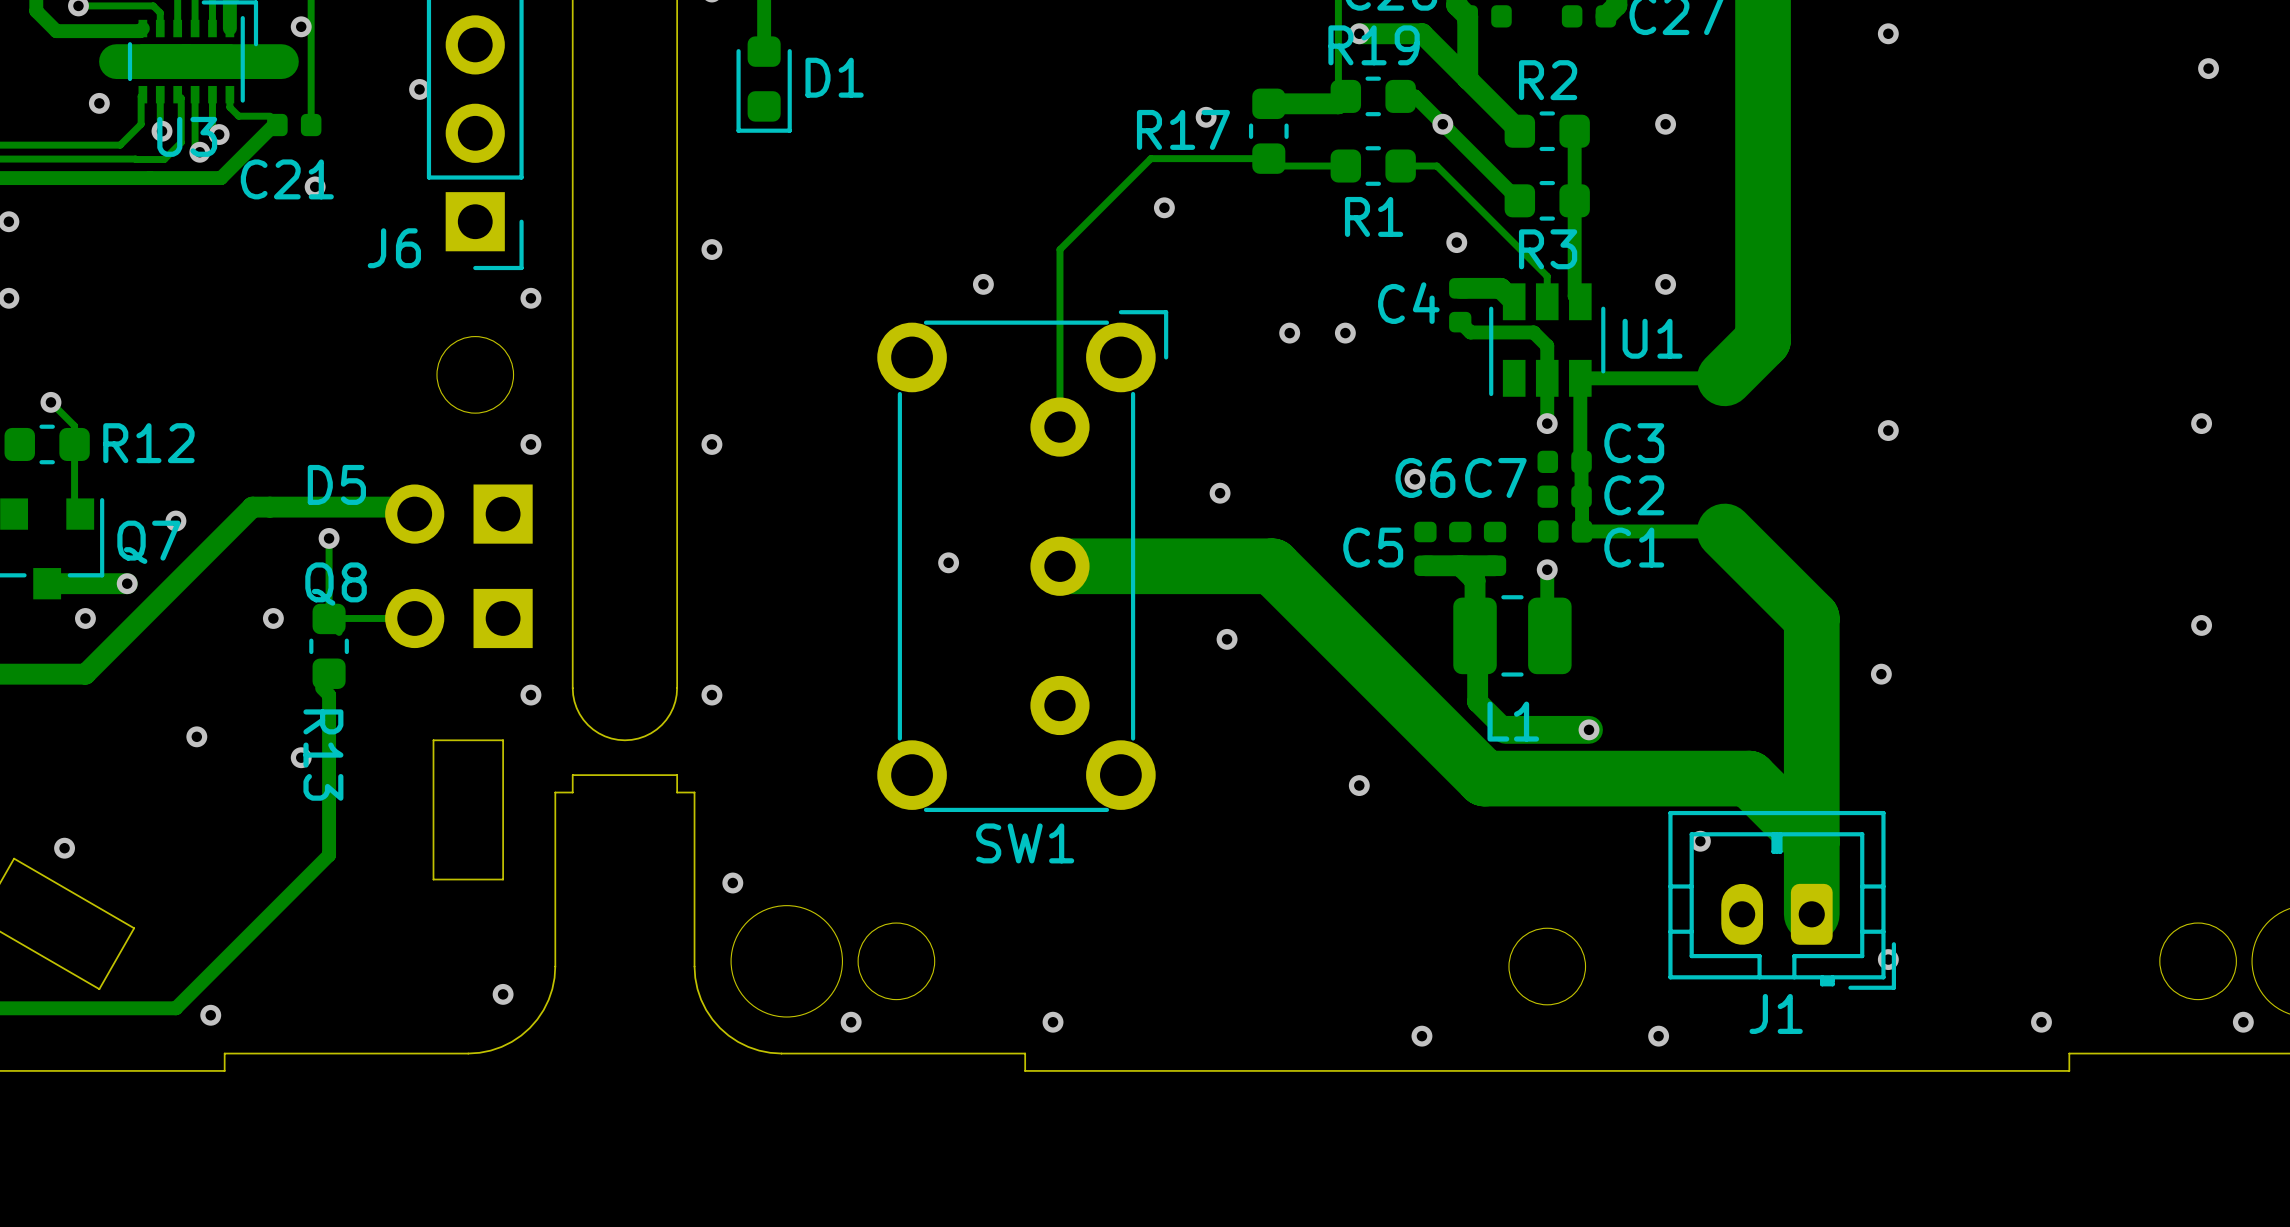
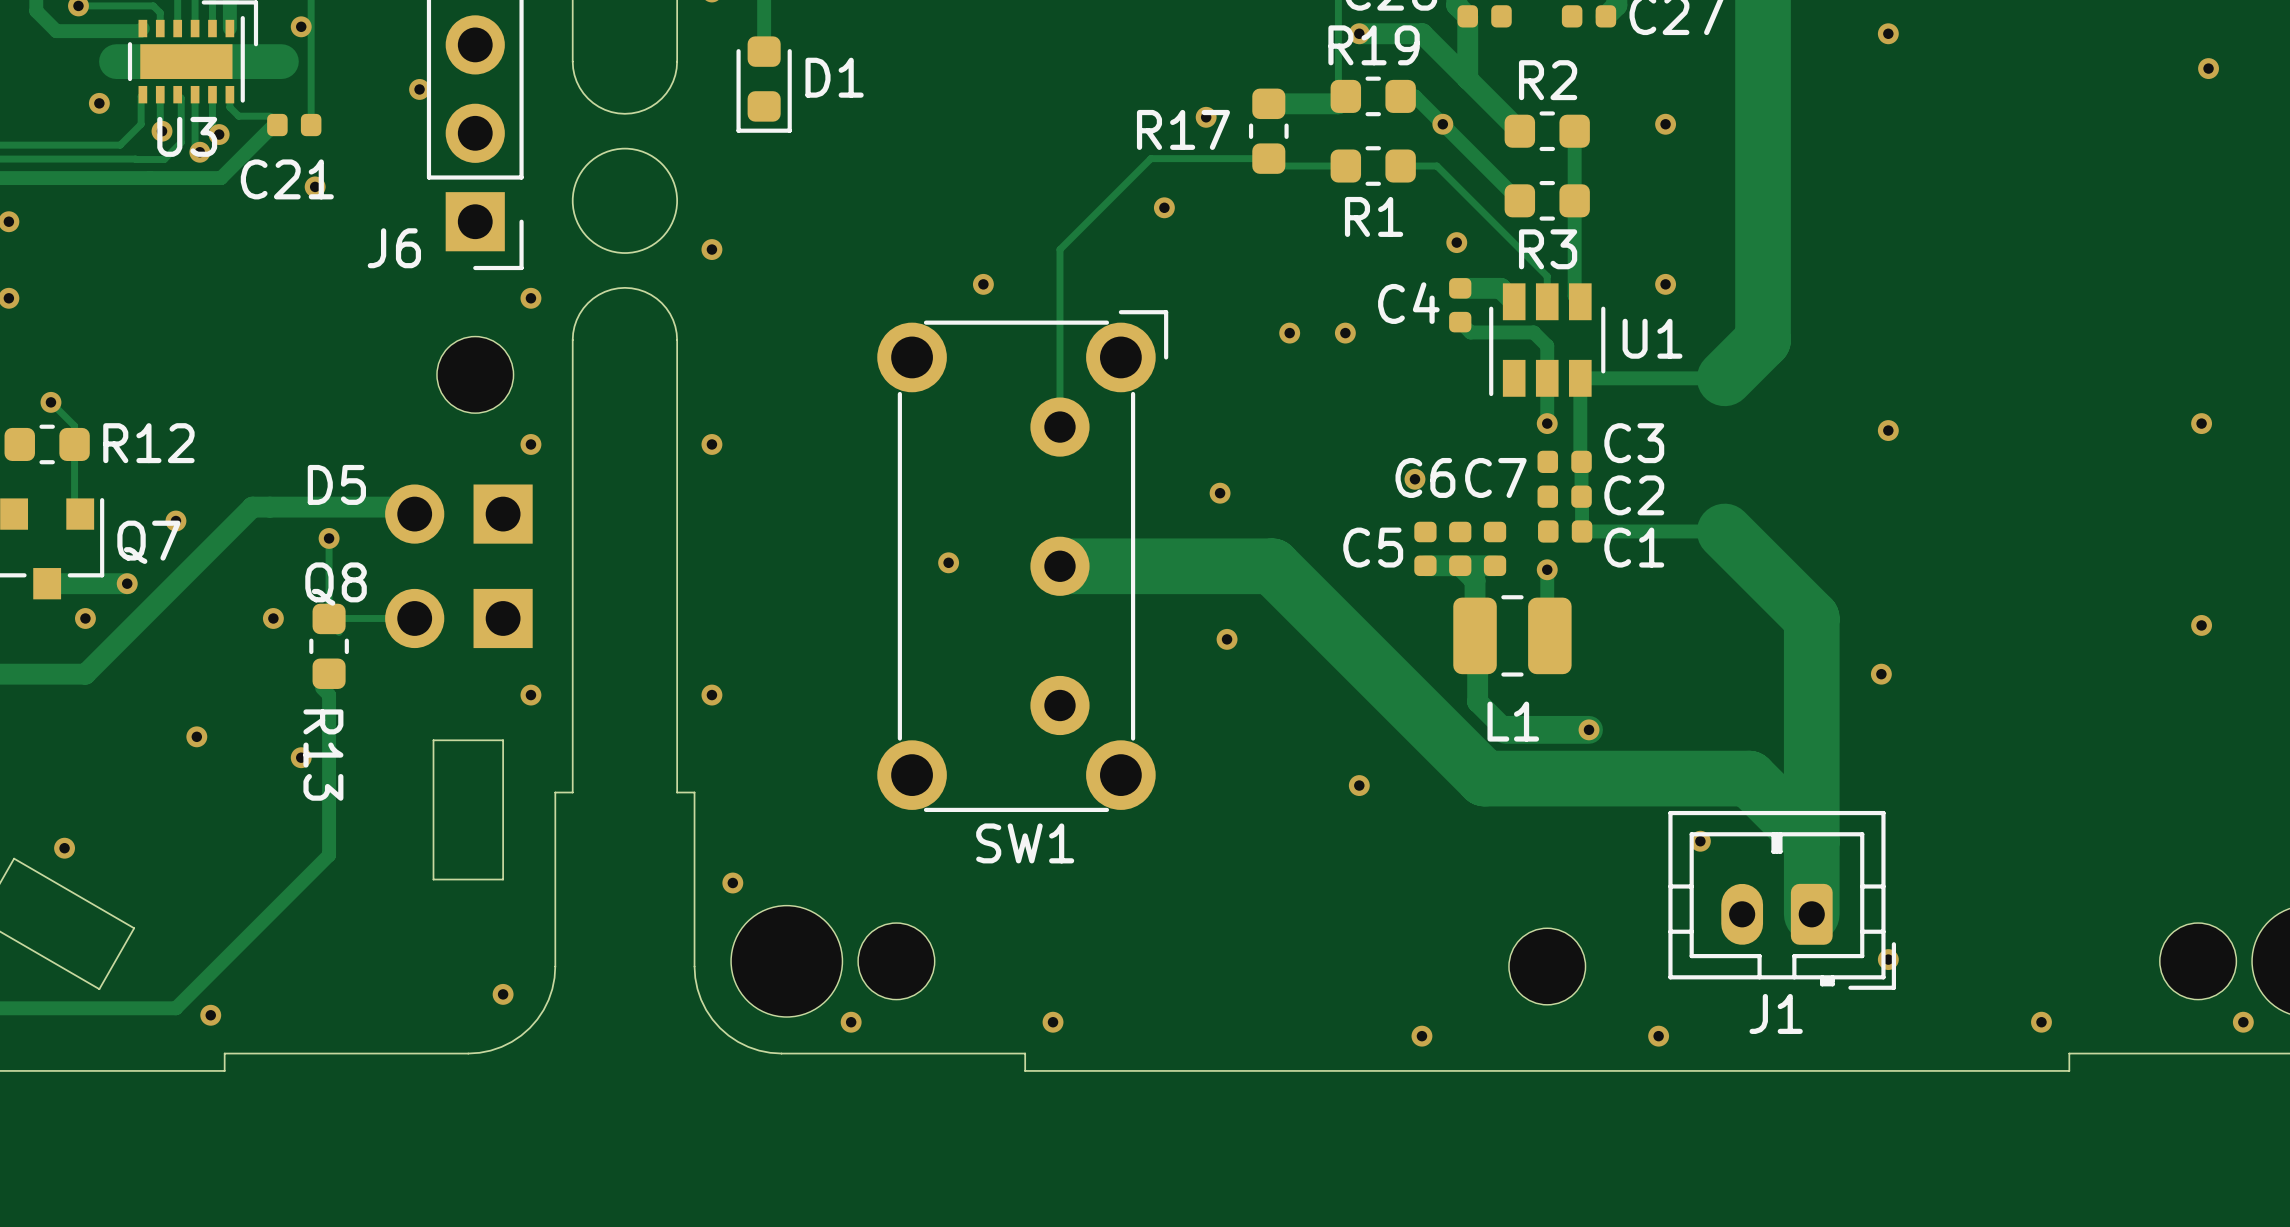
board edge: (572, 61) (572, 340) -> (677, 340) (673, 320) (661, 303) (644, 291) (624, 287) (604, 291) (588, 303) (576, 320) (572, 340)
board edge: (677, 61) (677, 340) -> (677, 61) (673, 81) (661, 98) (644, 109) (624, 113) (604, 109) (588, 98) (576, 81) (572, 61)
round board edge: none -> [571, 147, 679, 254]
board edge: (677, 688) (673, 708) (661, 725) (644, 736) (624, 740) (604, 736) (588, 725) (576, 708) (572, 688) -> (677, 688) (677, 775)
board edge: (677, 775) (572, 775) -> (572, 688) (572, 775)

